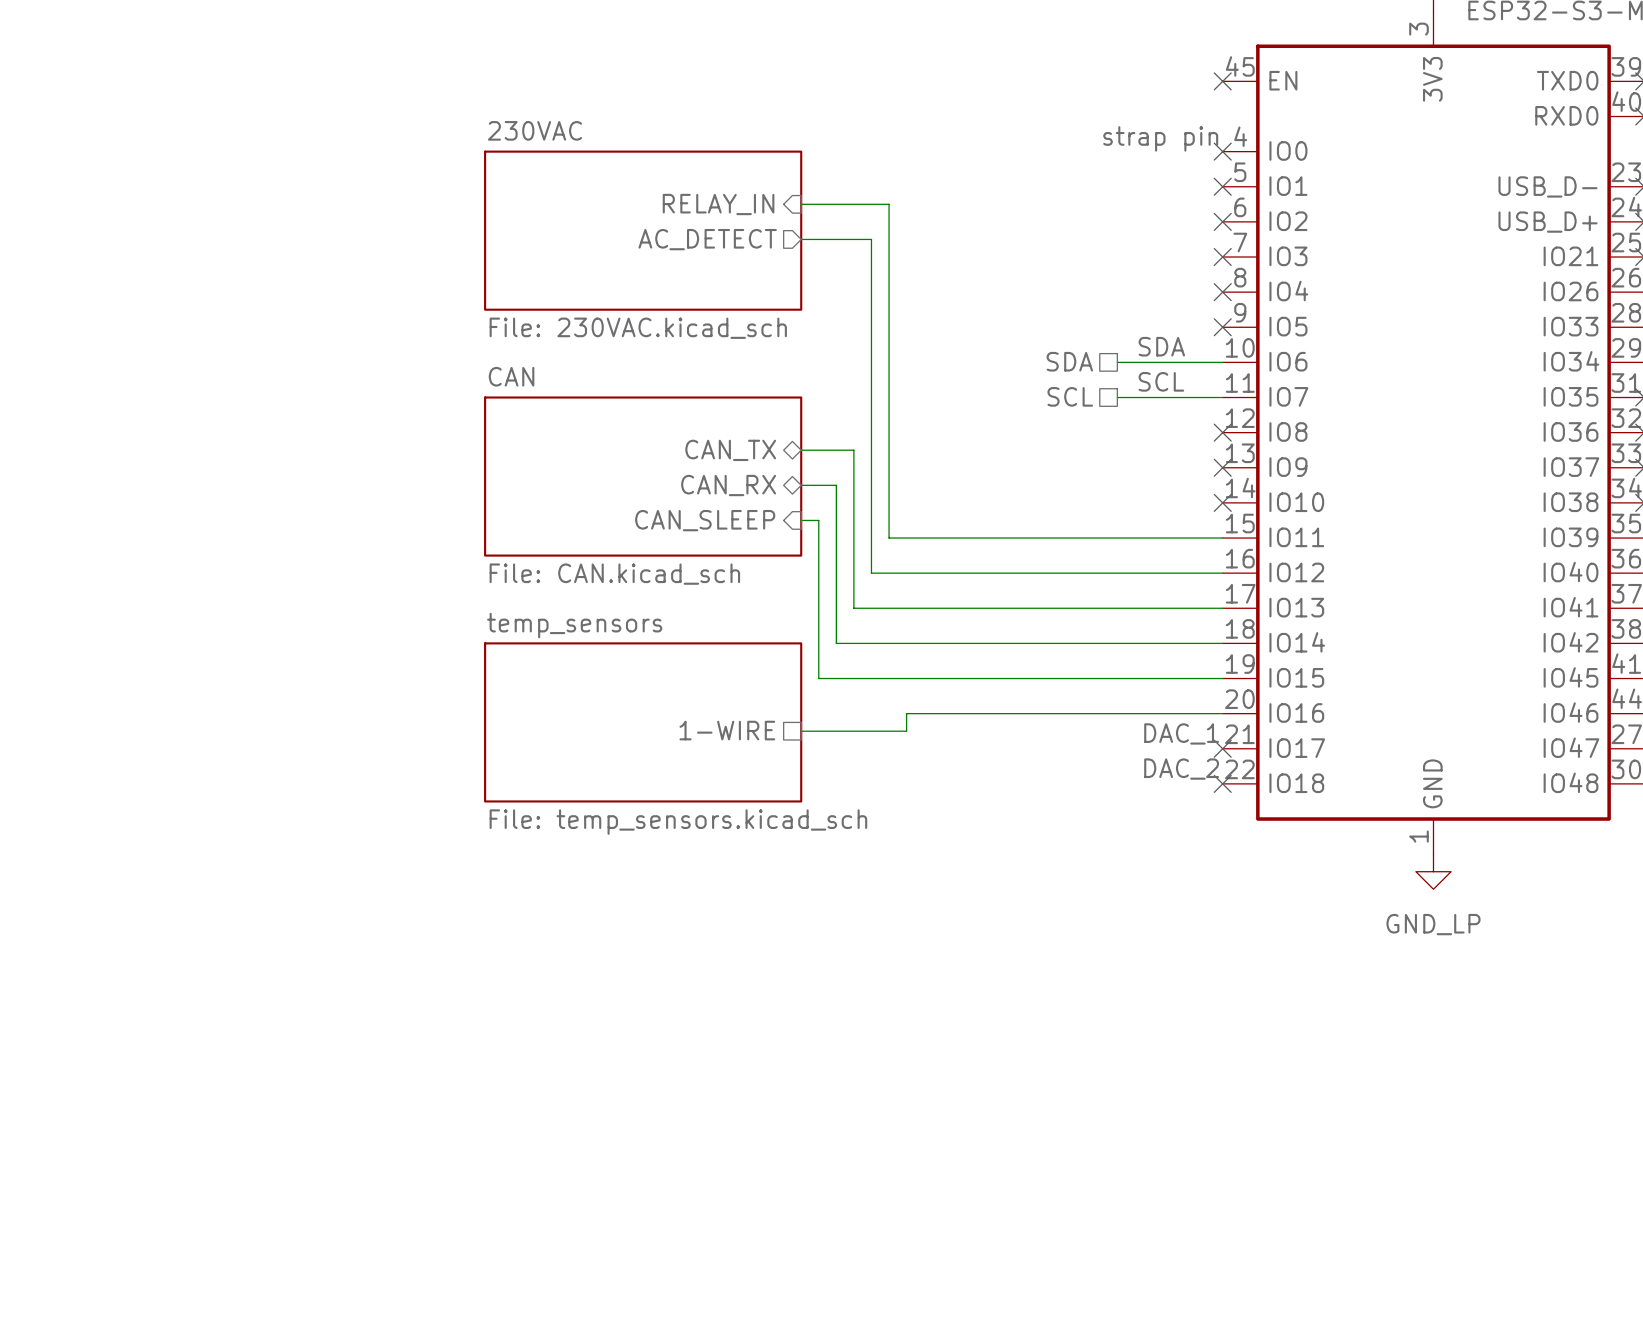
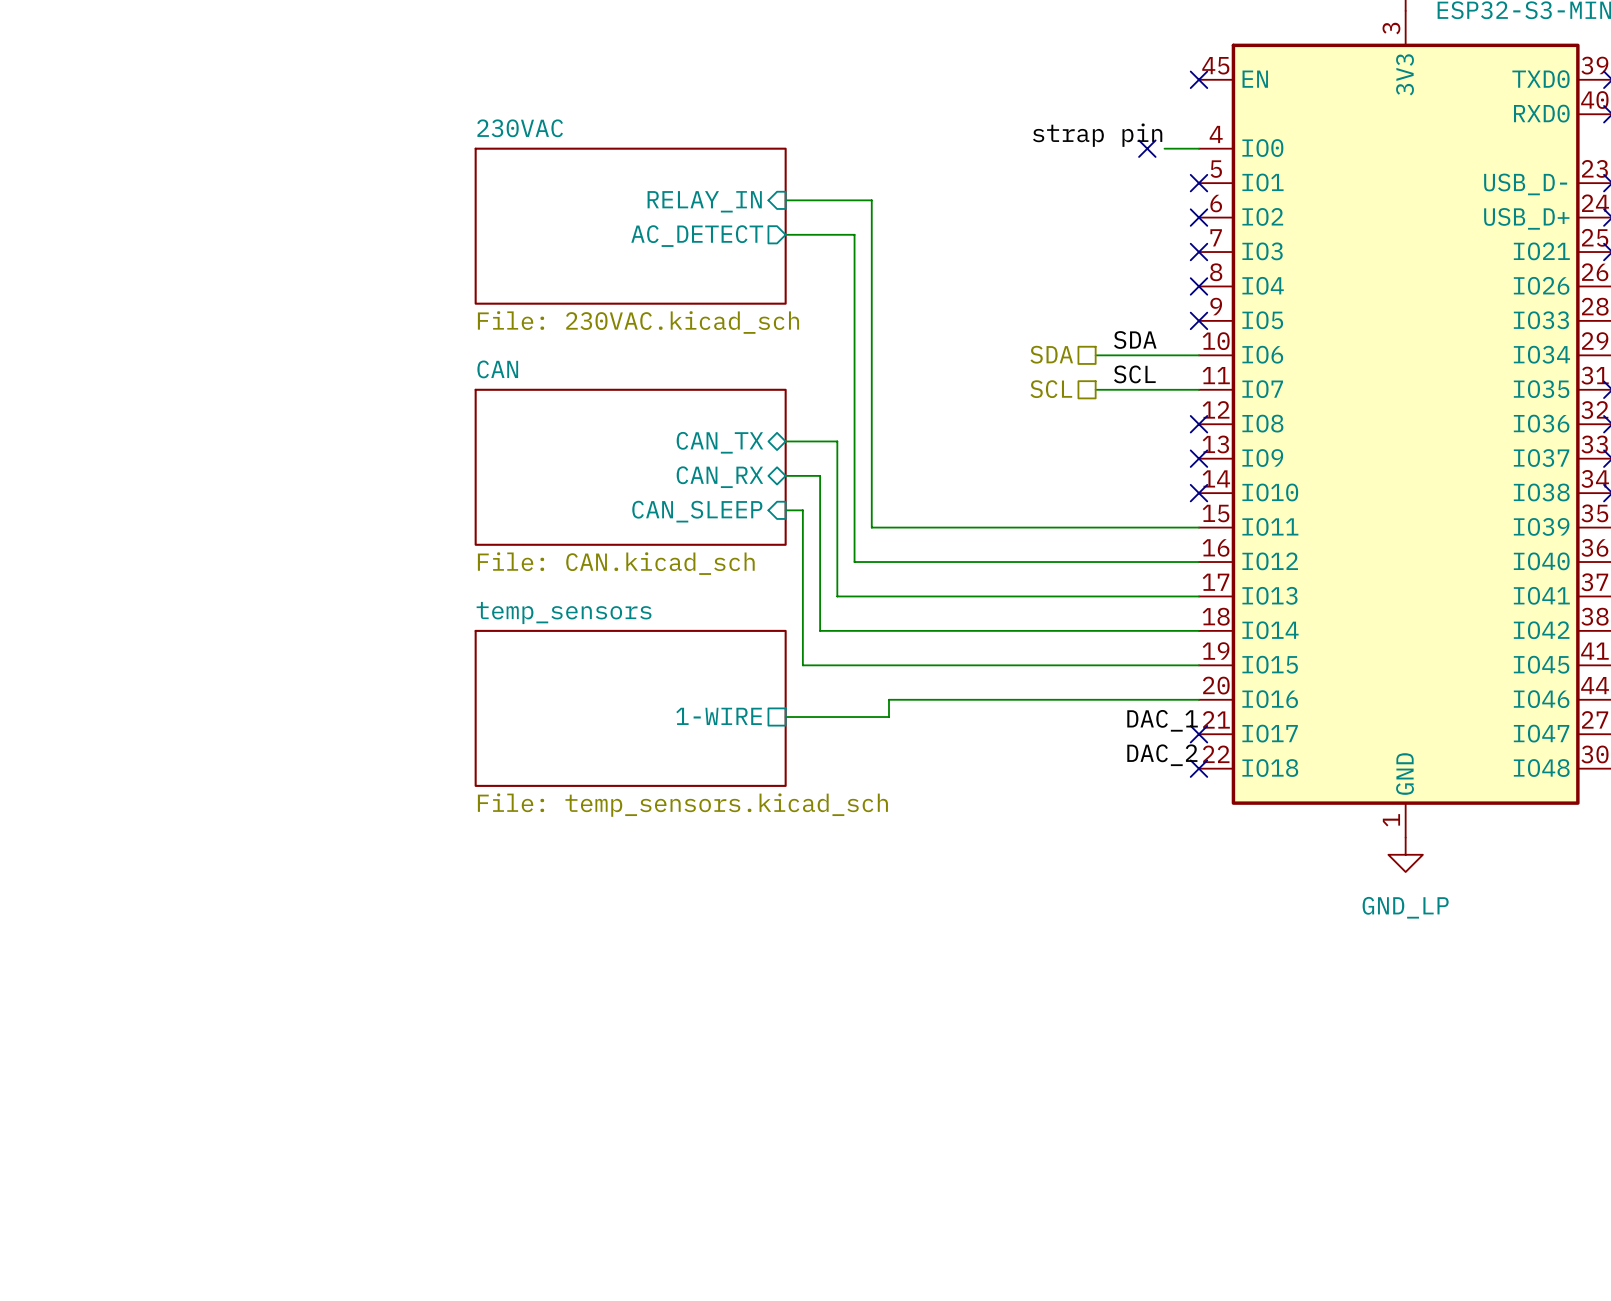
label position: strap pin (1160, 138) -> strap pin (1097, 135)
wire: none -> (1164, 148) (1198, 148)
no-connect mark position: (1222, 151) -> (1147, 148)

